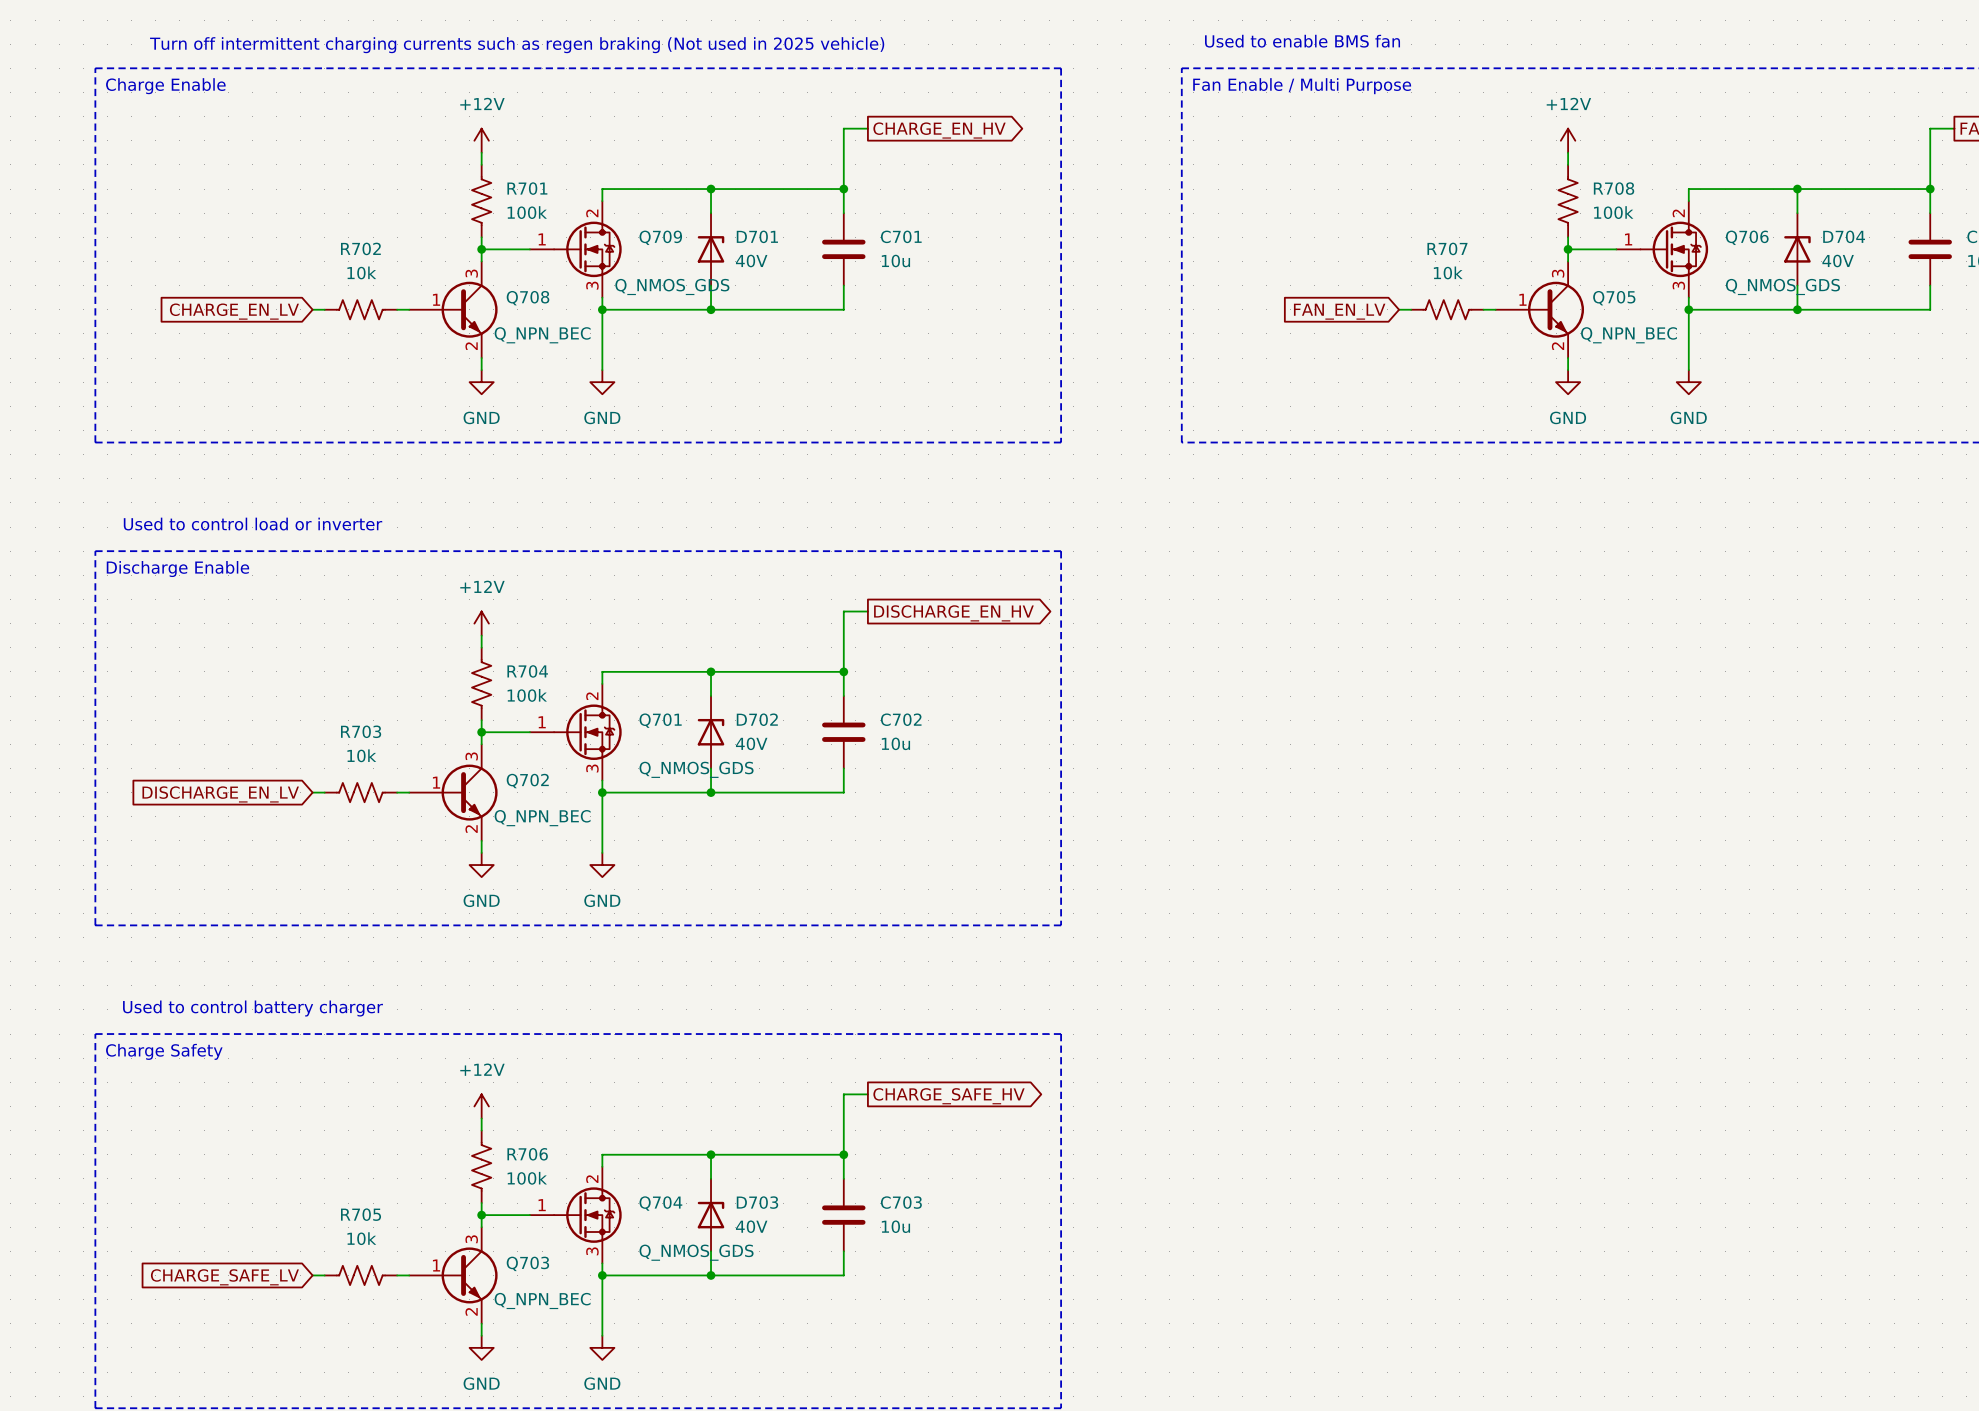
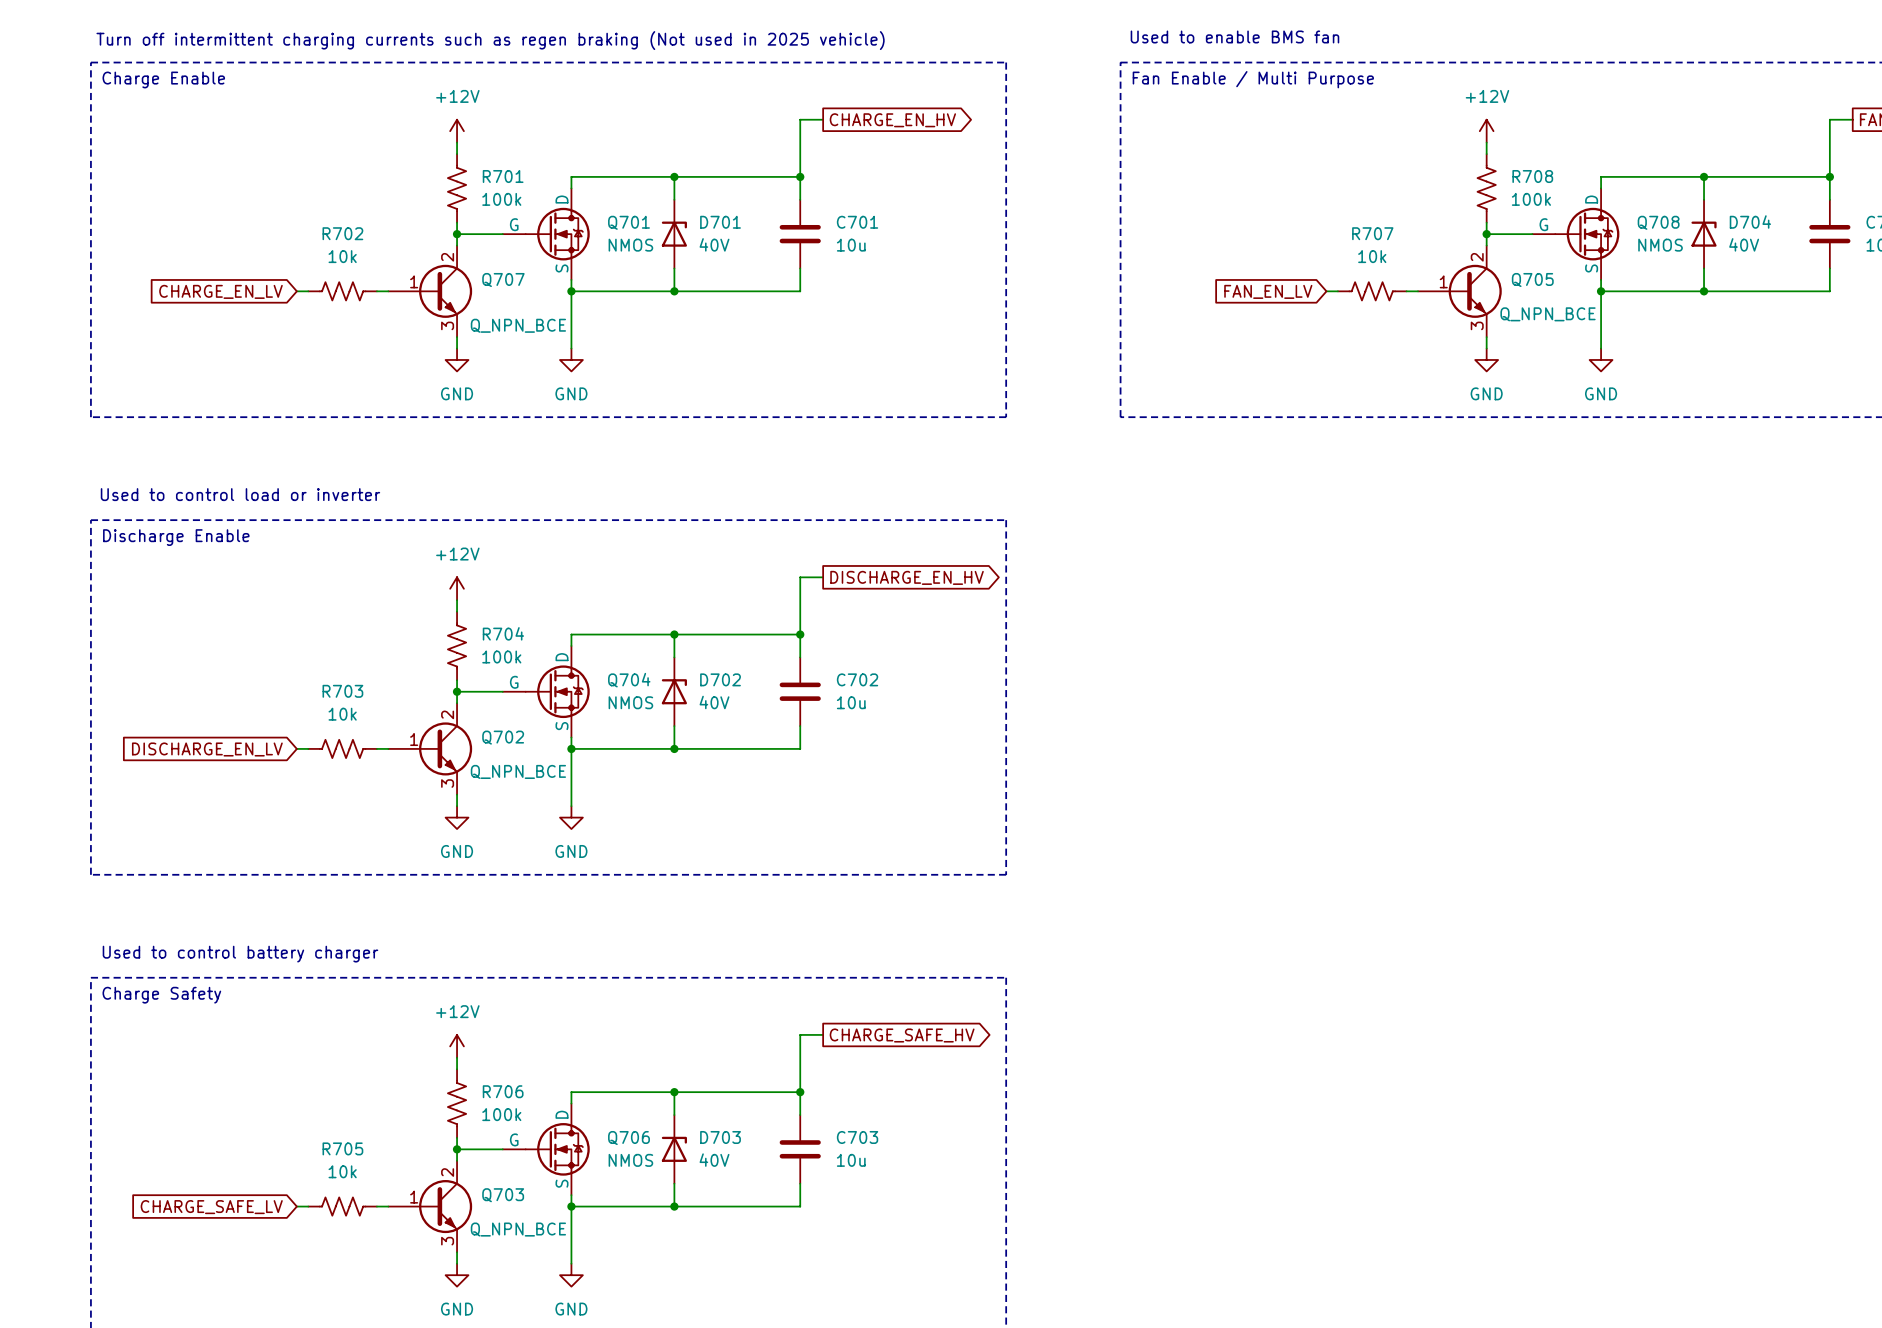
Q701 pin name: none -> D (562, 199)
Q706 pin number: 2 (1678, 213) -> none
Q701 pin name: none -> G (514, 224)
Q706 pin number: 1 (1628, 239) -> none
Q709: Q_NMOS_GDS (575, 249) -> none
Q706 position: (1662, 249) -> (546, 1149)
Q708 symbol: [409, 261, 498, 359] -> [1532, 188, 1620, 280]
Q705 pin number: 3 (1558, 273) -> 2 (1477, 257)
Q701 pin name: none -> S (562, 268)
Q706 pin number: 3 (1678, 285) -> none
Q706 value: Q_NMOS_GDS (1782, 286) -> NMOS (630, 1160)
Q707: none -> Q_NPN_BCE (430, 291)
Q708 value: Q_NPN_BEC (542, 335) -> NMOS (1660, 245)
Q705 value: Q_NPN_BEC (1629, 335) -> Q_NPN_BCE (1548, 314)
Q705 pin number: 2 (1558, 346) -> 3 (1477, 325)
Q704 pin name: none -> D (562, 657)
Q701 pin number: 2 (592, 696) -> none
Q704 pin name: none -> G (514, 682)
Q701 pin number: 1 (542, 722) -> none
Q701 position: (575, 732) -> (546, 234)
Q702 pin number: 3 (471, 756) -> 2 (447, 714)
Q704 pin name: none -> S (562, 726)
Q701 pin number: 3 (592, 768) -> none
Q701 value: Q_NMOS_GDS (696, 769) -> NMOS (630, 245)
Q702 value: Q_NPN_BEC (542, 818) -> Q_NPN_BCE (518, 771)
Q702 pin number: 2 (471, 829) -> 3 (447, 783)
Q706 pin name: none -> D (562, 1114)
Q704 pin number: 2 (592, 1179) -> none
Q706 pin name: none -> G (514, 1139)
Q704 pin number: 1 (542, 1205) -> none
Q704 position: (575, 1215) -> (546, 691)
Q703 pin number: 3 (471, 1239) -> 2 (447, 1172)
Q706 pin name: none -> S (562, 1183)
Q704 pin number: 3 (592, 1251) -> none
Q704 value: Q_NMOS_GDS (696, 1252) -> NMOS (630, 702)
Q703 value: Q_NPN_BEC (542, 1300) -> Q_NPN_BCE (518, 1229)
Q703 pin number: 2 (471, 1311) -> 3 (447, 1241)

